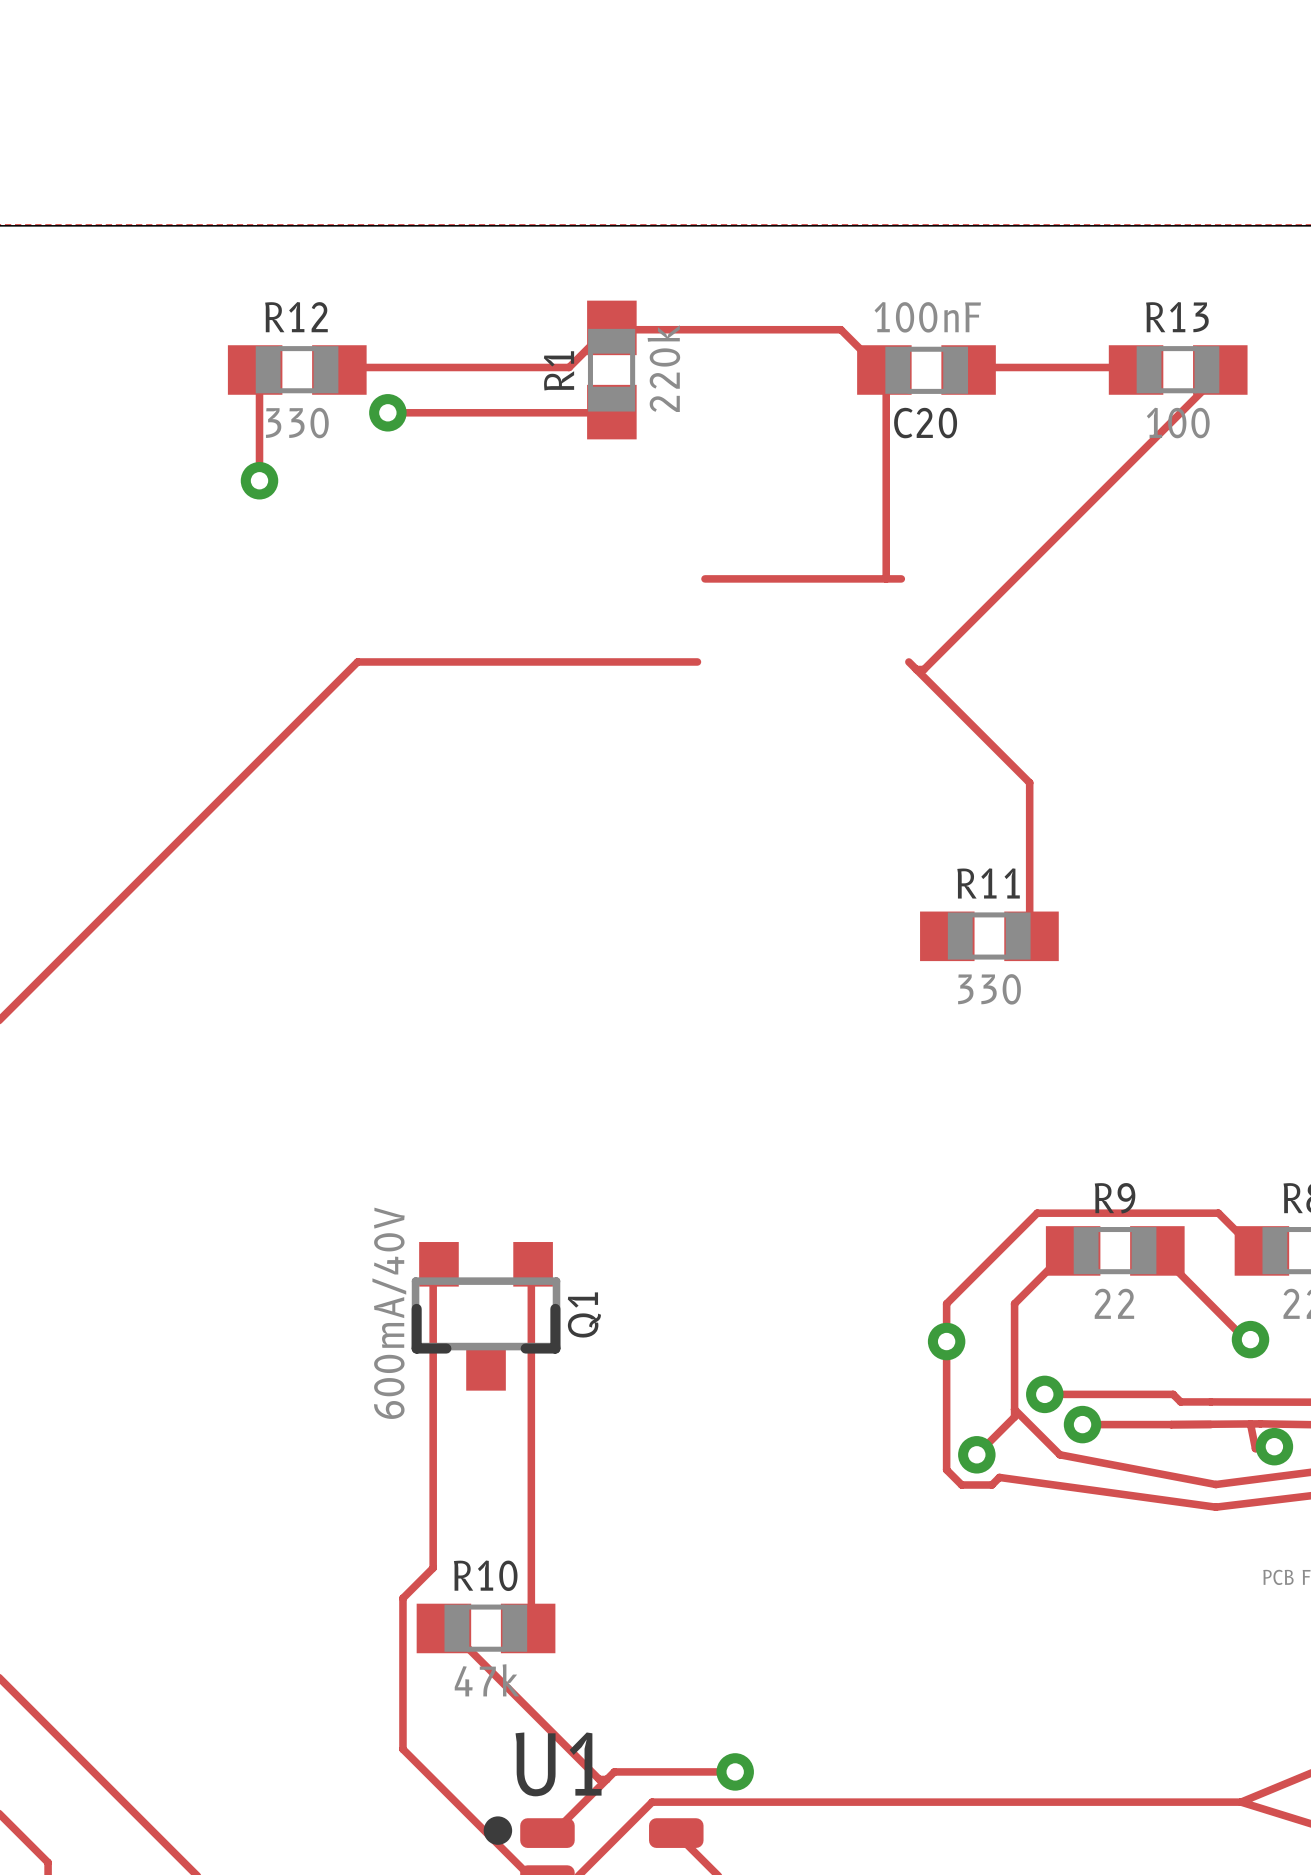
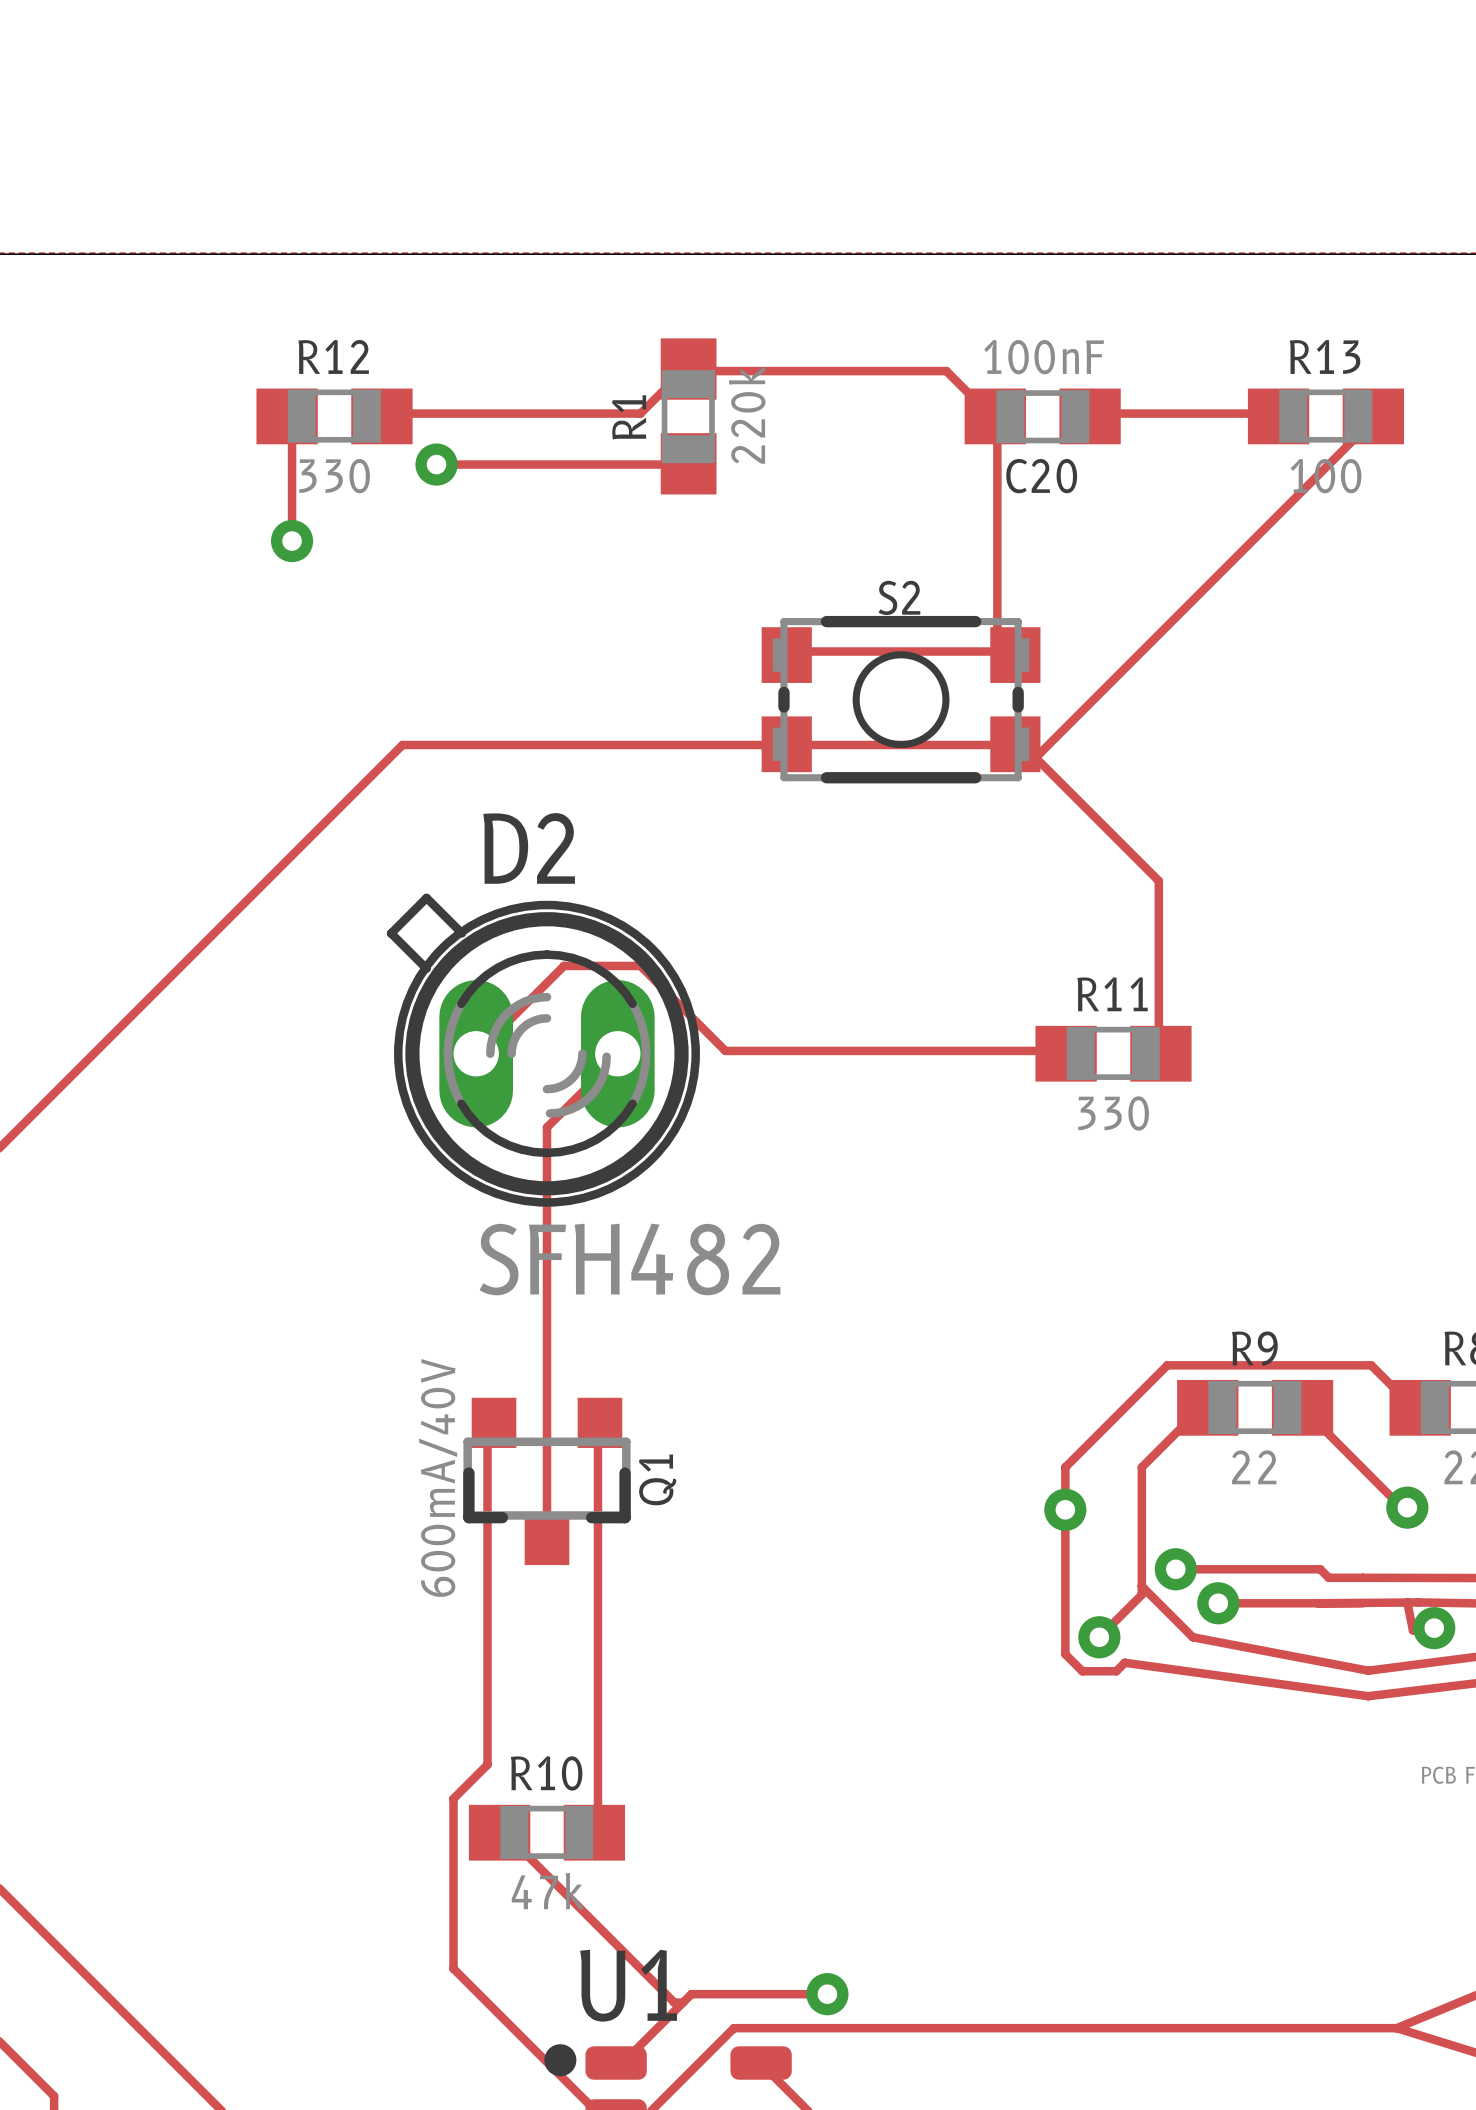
S2: none -> (901, 699)
track: none -> (1015, 744) (784, 744)
D2: none -> SFH482 (543, 1050)
track: none -> (476, 1053) (563, 965) (640, 965) (725, 1050) (1065, 1050) (1066, 1053)
track: none -> (617, 1053) (614, 1059) (546, 1127) (546, 1539)

